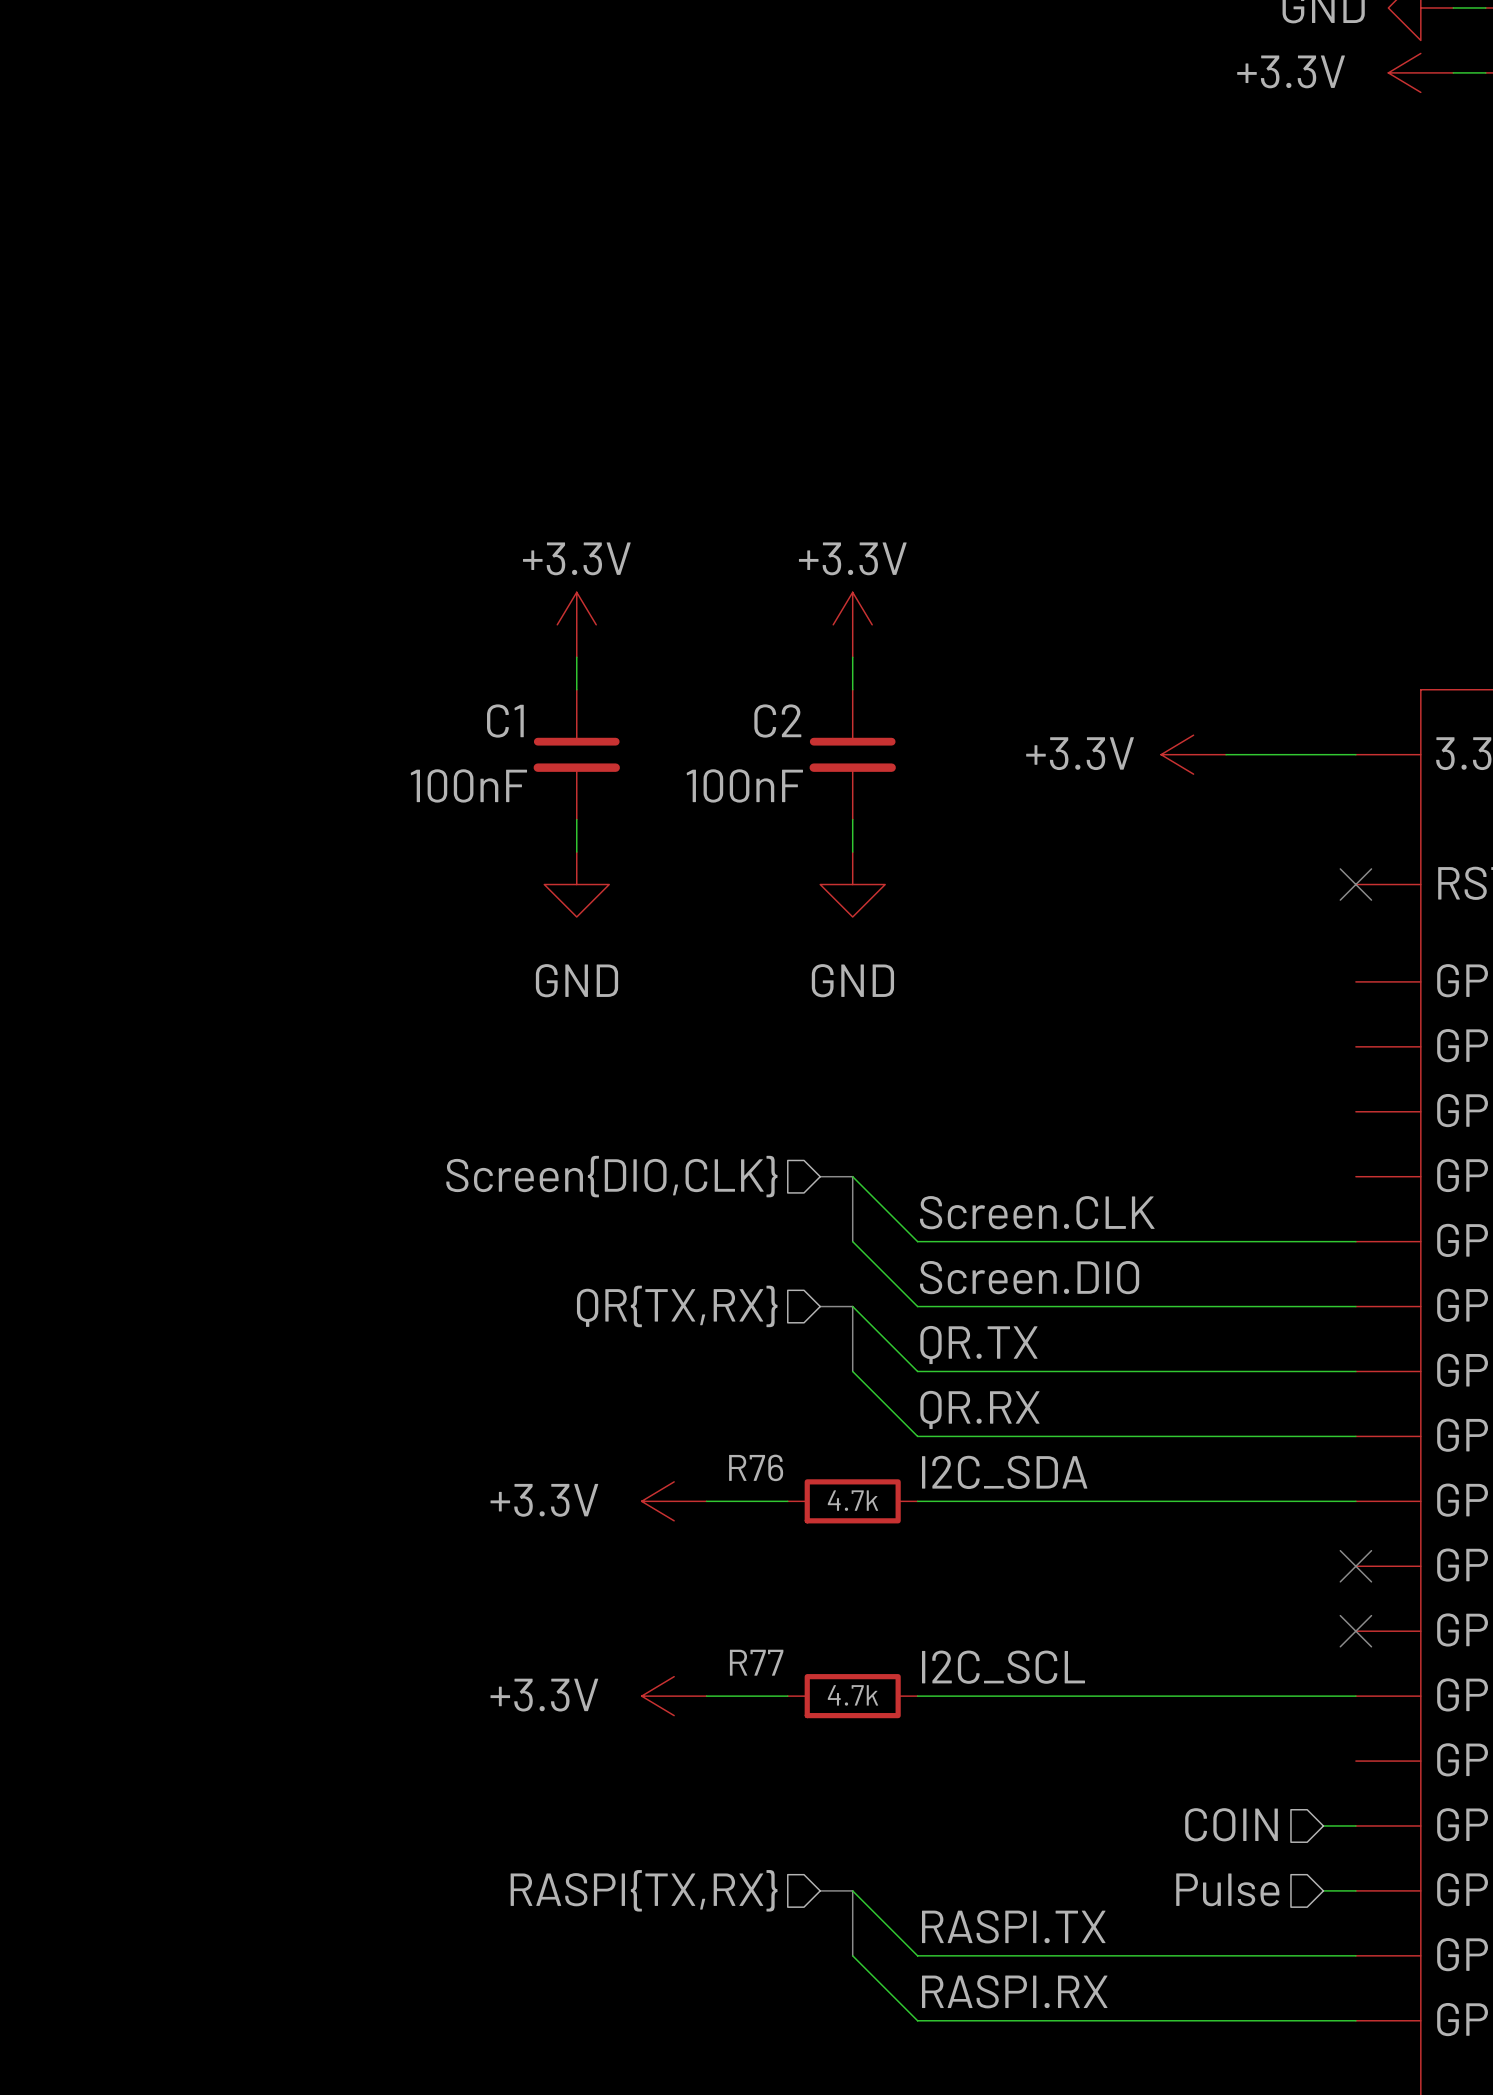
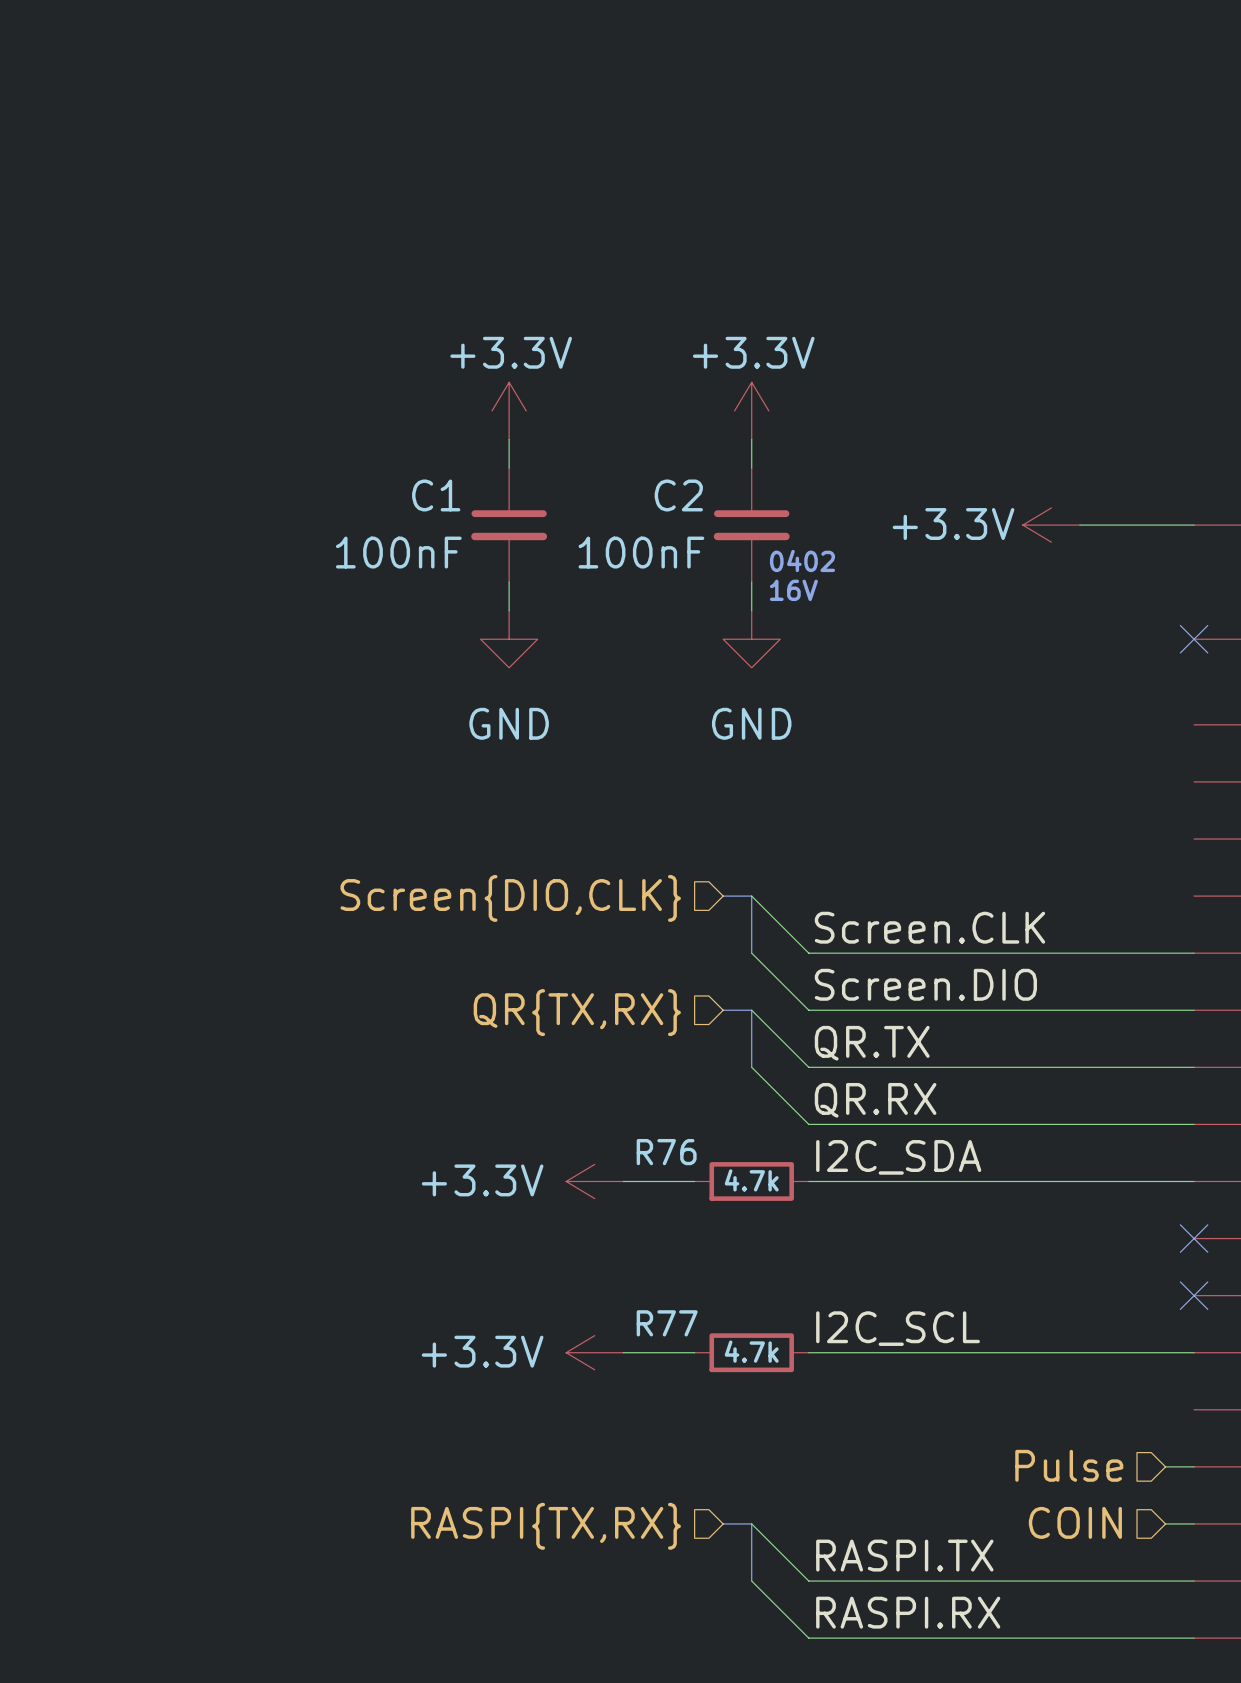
text: none -> 0402 (802, 560)
text: none -> 16V (793, 590)
hierarchical label: COIN (1231, 1824) -> Pulse (1069, 1465)
hierarchical label: Pulse (1227, 1889) -> COIN (1075, 1522)

